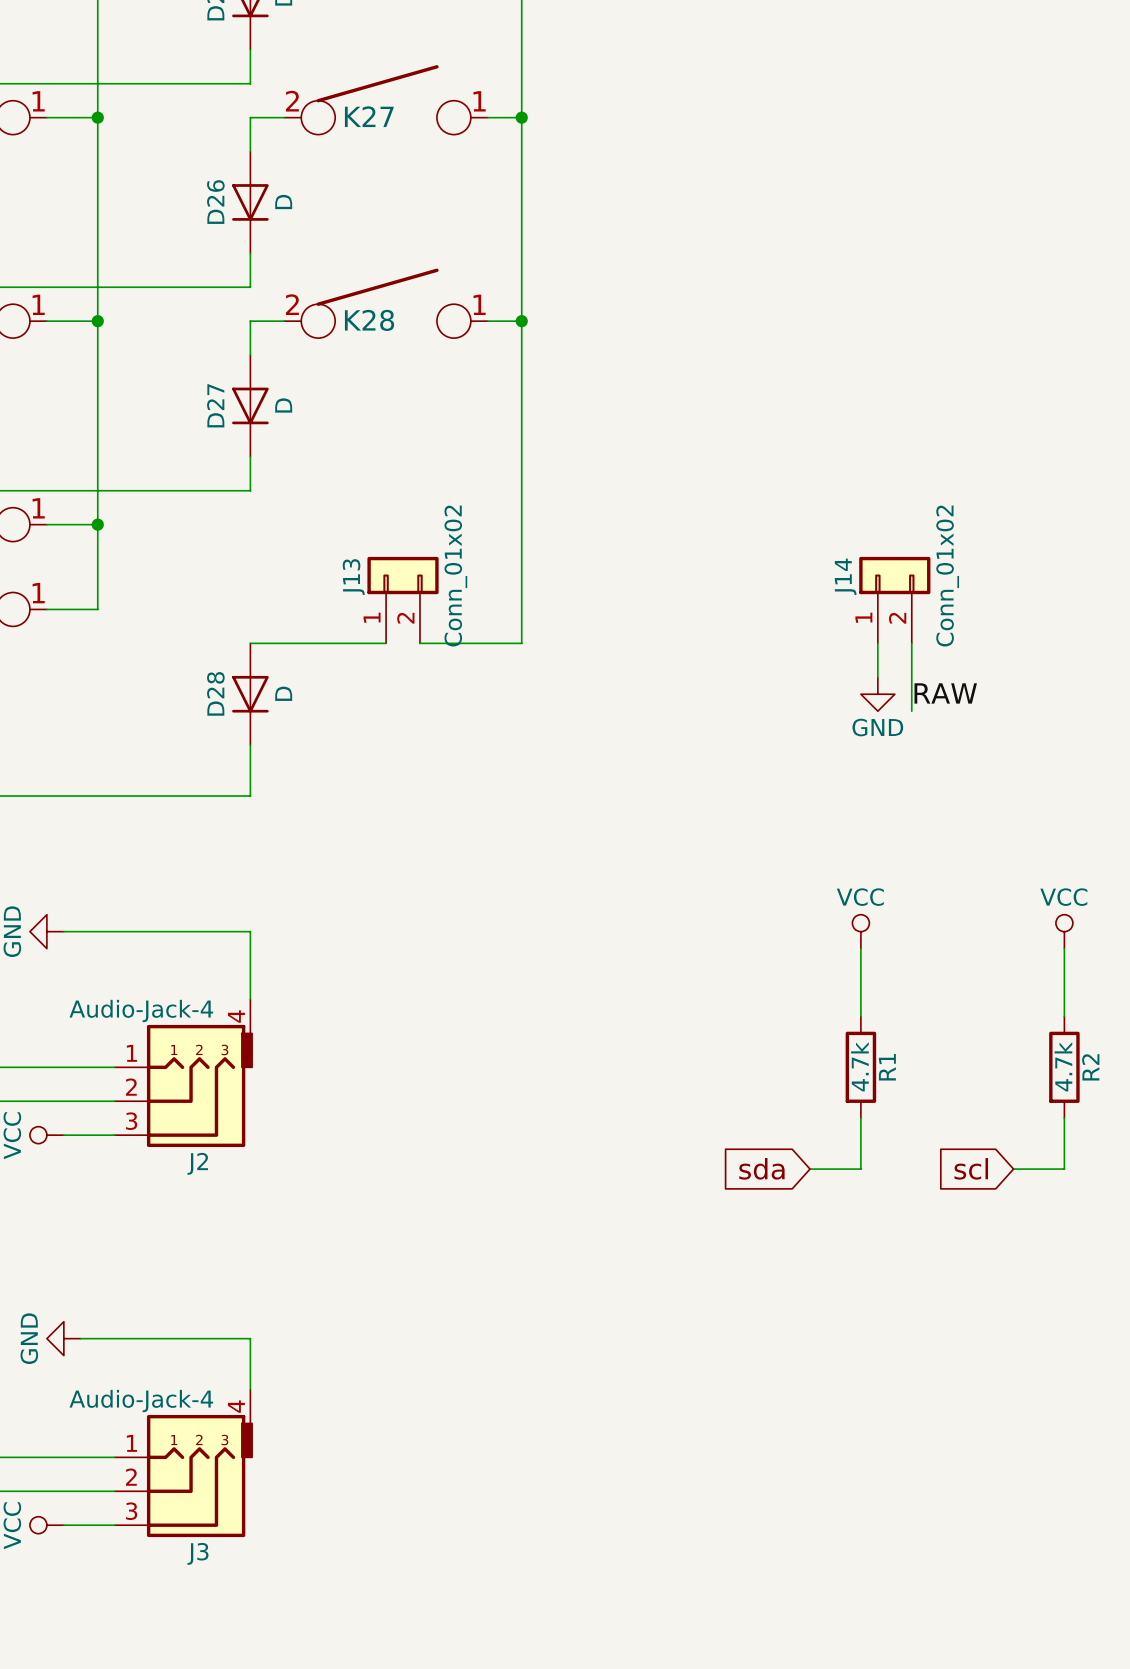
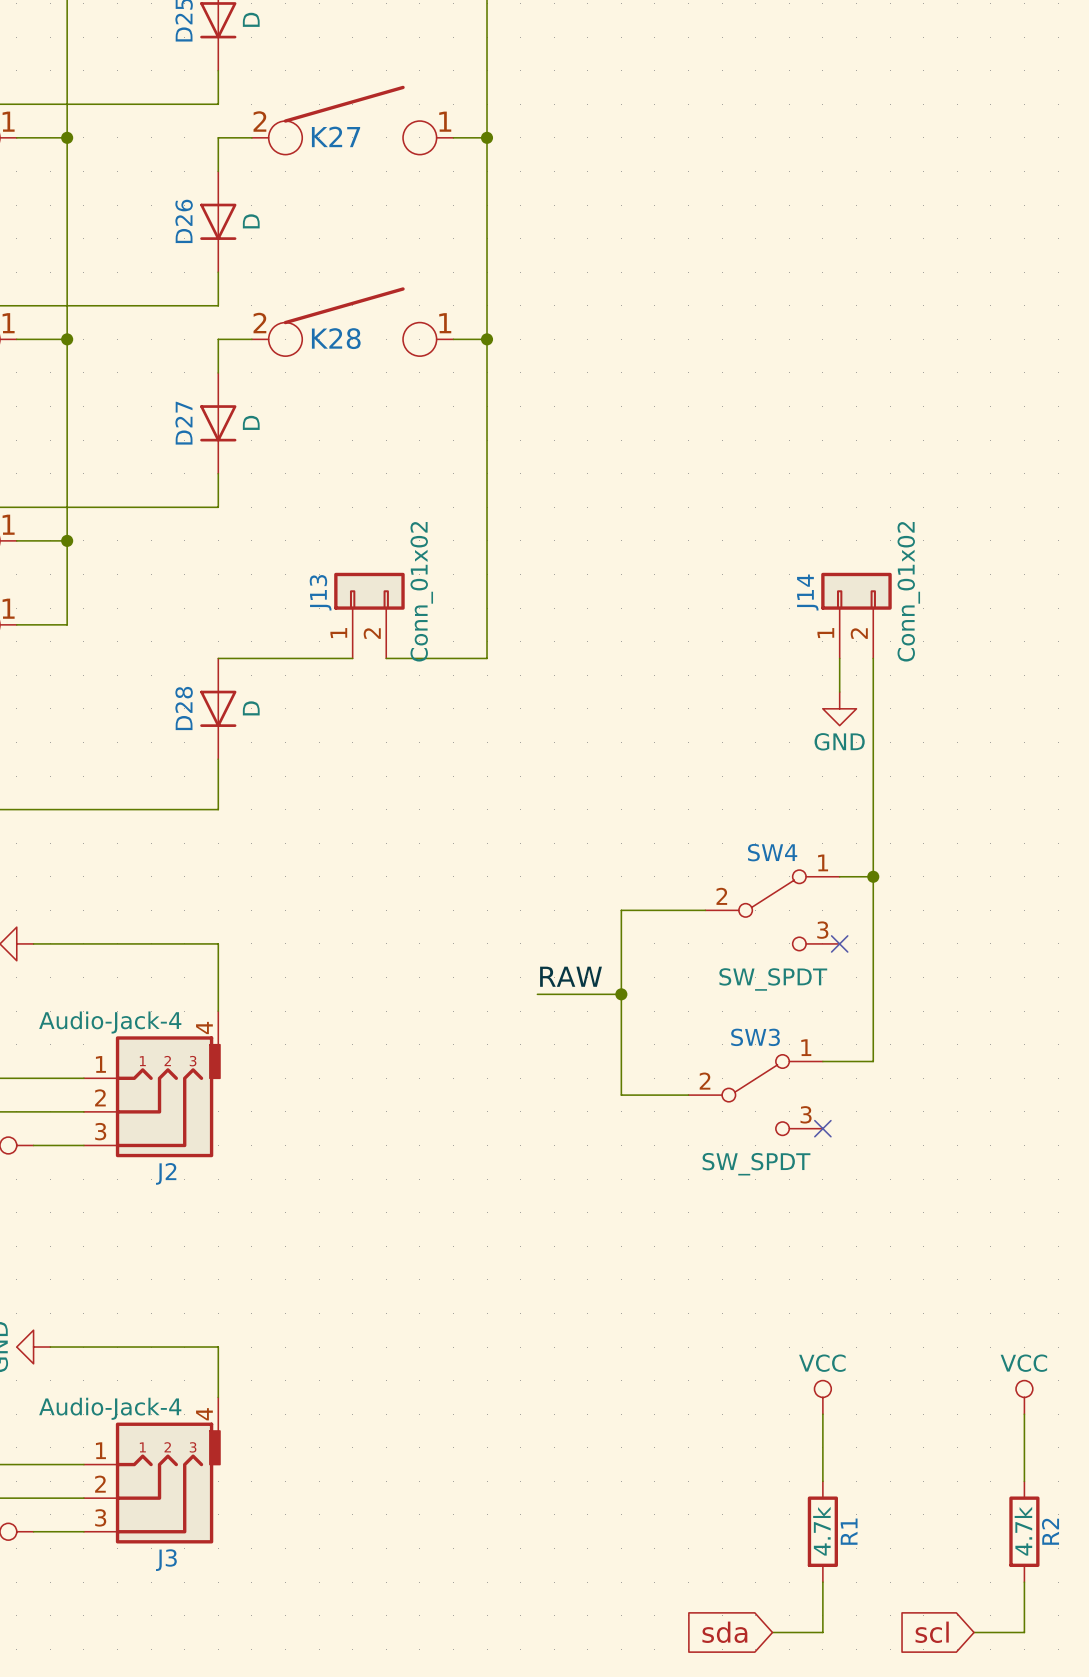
label: RAW (945, 693) -> none
wire: none -> (873, 725) (873, 1061) (822, 1061)
wire: none -> (839, 876) (873, 876)
junction: none -> (873, 876)
wire: none -> (705, 910) (621, 910) (621, 1095) (688, 1095)
SW4: none -> SW_SPDT (772, 910)
power symbol: VCC (860, 931) -> none
no-connect mark: none -> (839, 943)
power symbol: VCC (1064, 931) -> none
wire: (860, 948) (860, 1016) -> none
wire: (1064, 948) (1064, 1016) -> none
label: none -> RAW (571, 976)
wire: none -> (537, 994) (621, 994)
junction: none -> (621, 994)
R1 position: (860, 1067) -> (822, 1531)
R2 position: (1064, 1067) -> (1024, 1531)
SW3: none -> SW_SPDT (755, 1095)
wire: (860, 1118) (860, 1169) (810, 1169) -> none
no-connect mark: none -> (822, 1128)
wire: (1064, 1118) (1064, 1169) (1013, 1169) -> none
global label: sda (761, 1168) -> none
global label: scl (971, 1168) -> none
power symbol: none -> VCC (822, 1397)
power symbol: none -> VCC (1024, 1397)
wire: none -> (822, 1414) (822, 1481)
wire: none -> (1024, 1414) (1024, 1481)
wire: none -> (822, 1582) (822, 1632) (772, 1632)
wire: none -> (1024, 1582) (1024, 1632) (974, 1632)
global label: none -> sda (724, 1632)
global label: none -> scl (932, 1632)

